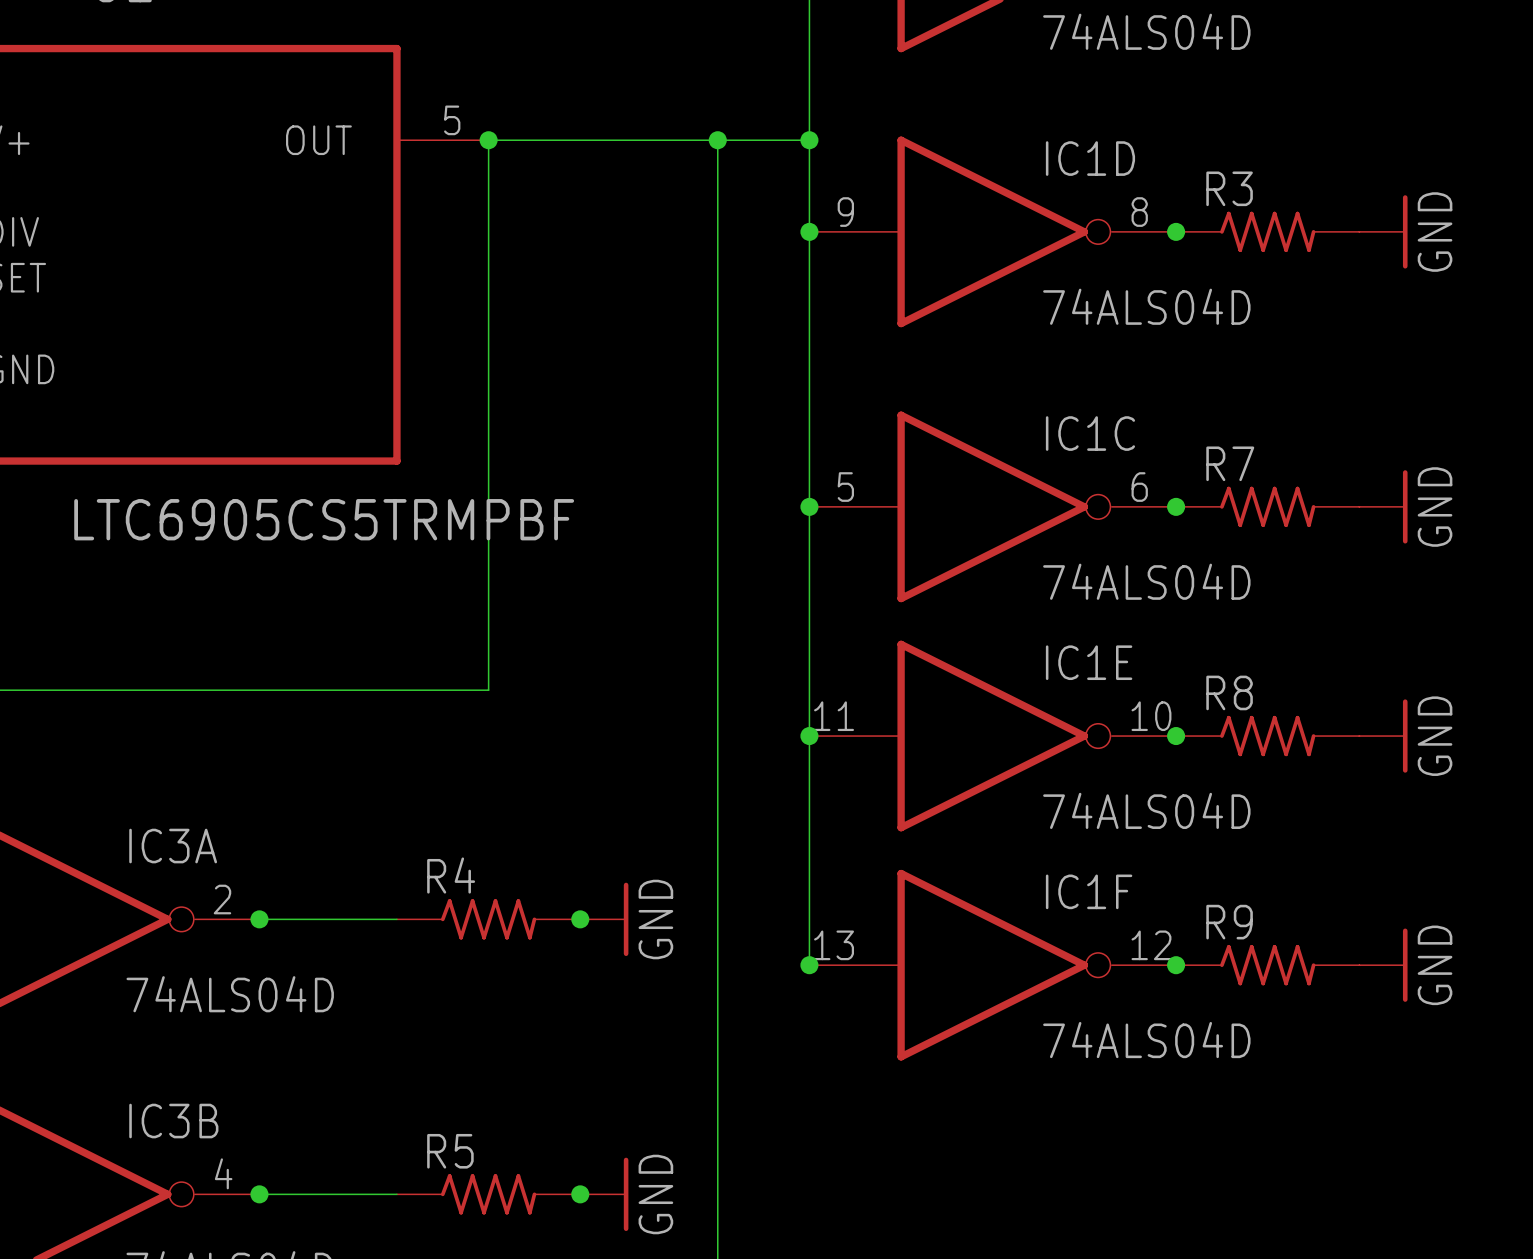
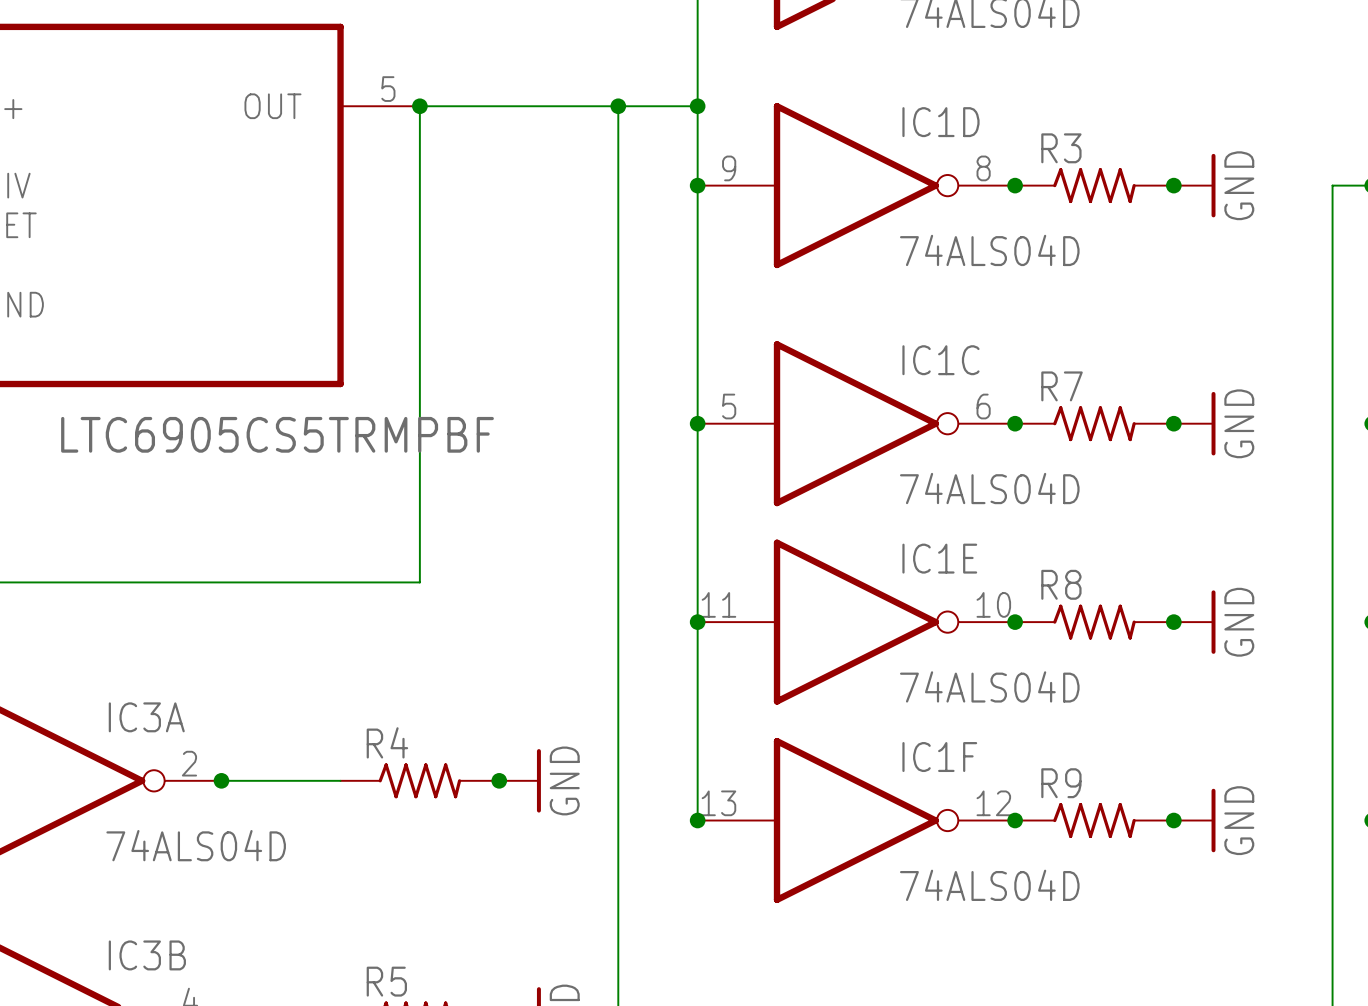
junction: none -> (1173, 185)
junction: none -> (1173, 423)
junction: none -> (1173, 622)
junction: none -> (1173, 820)

